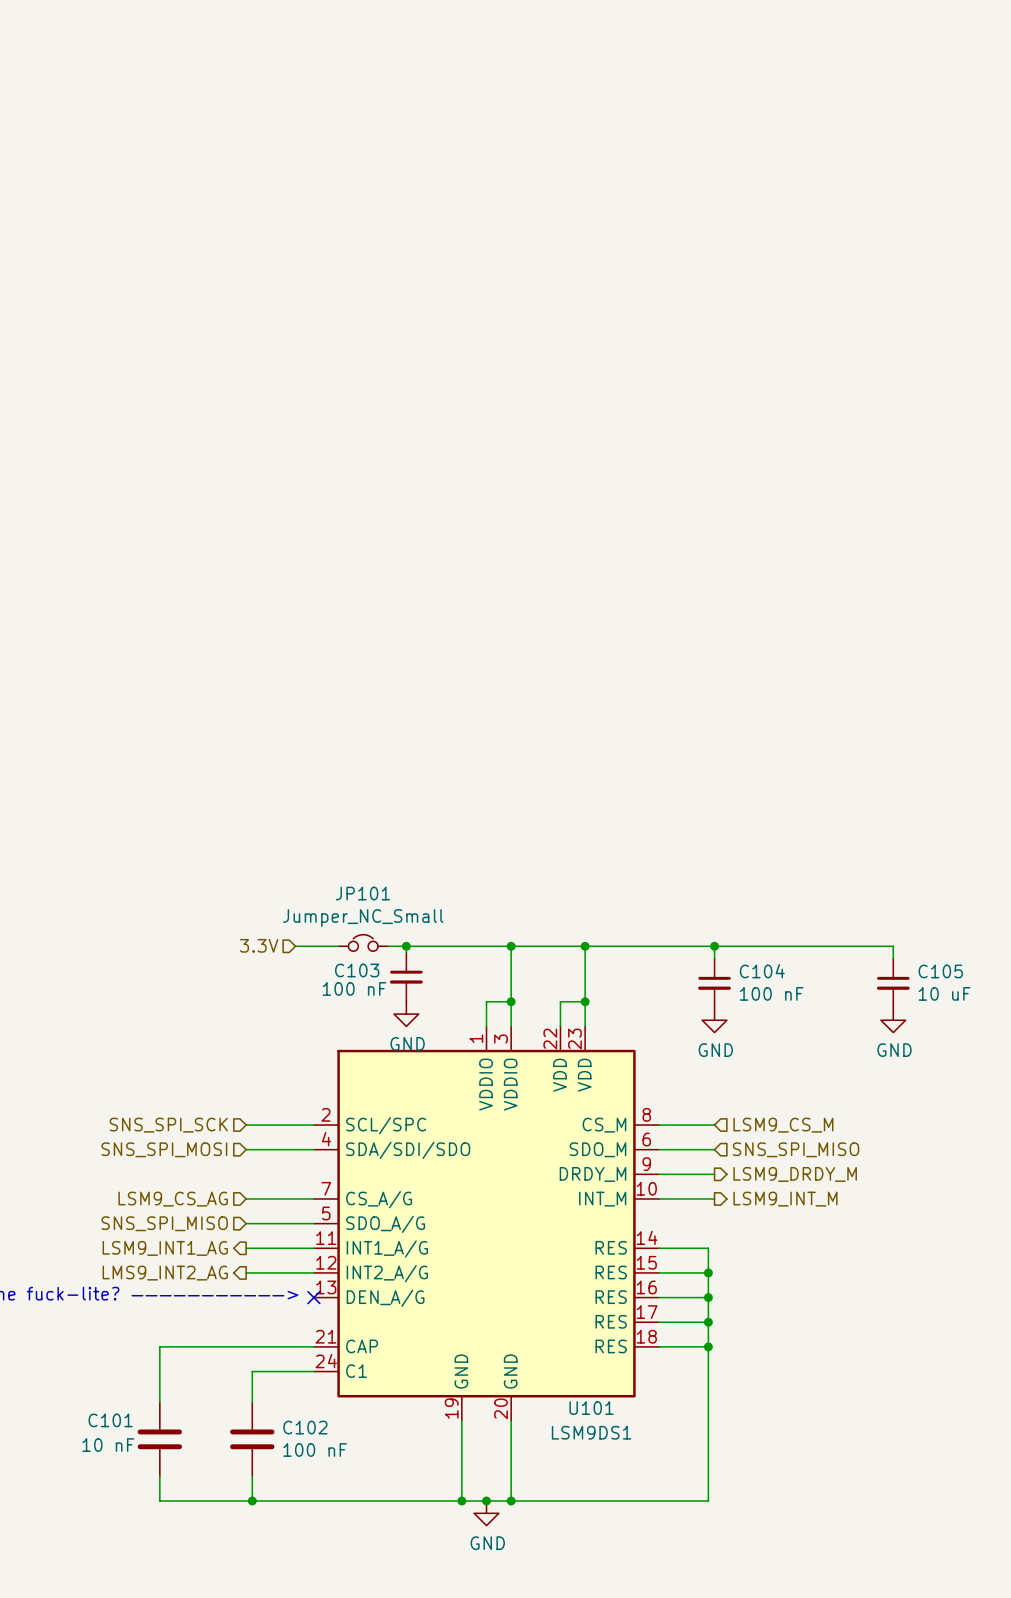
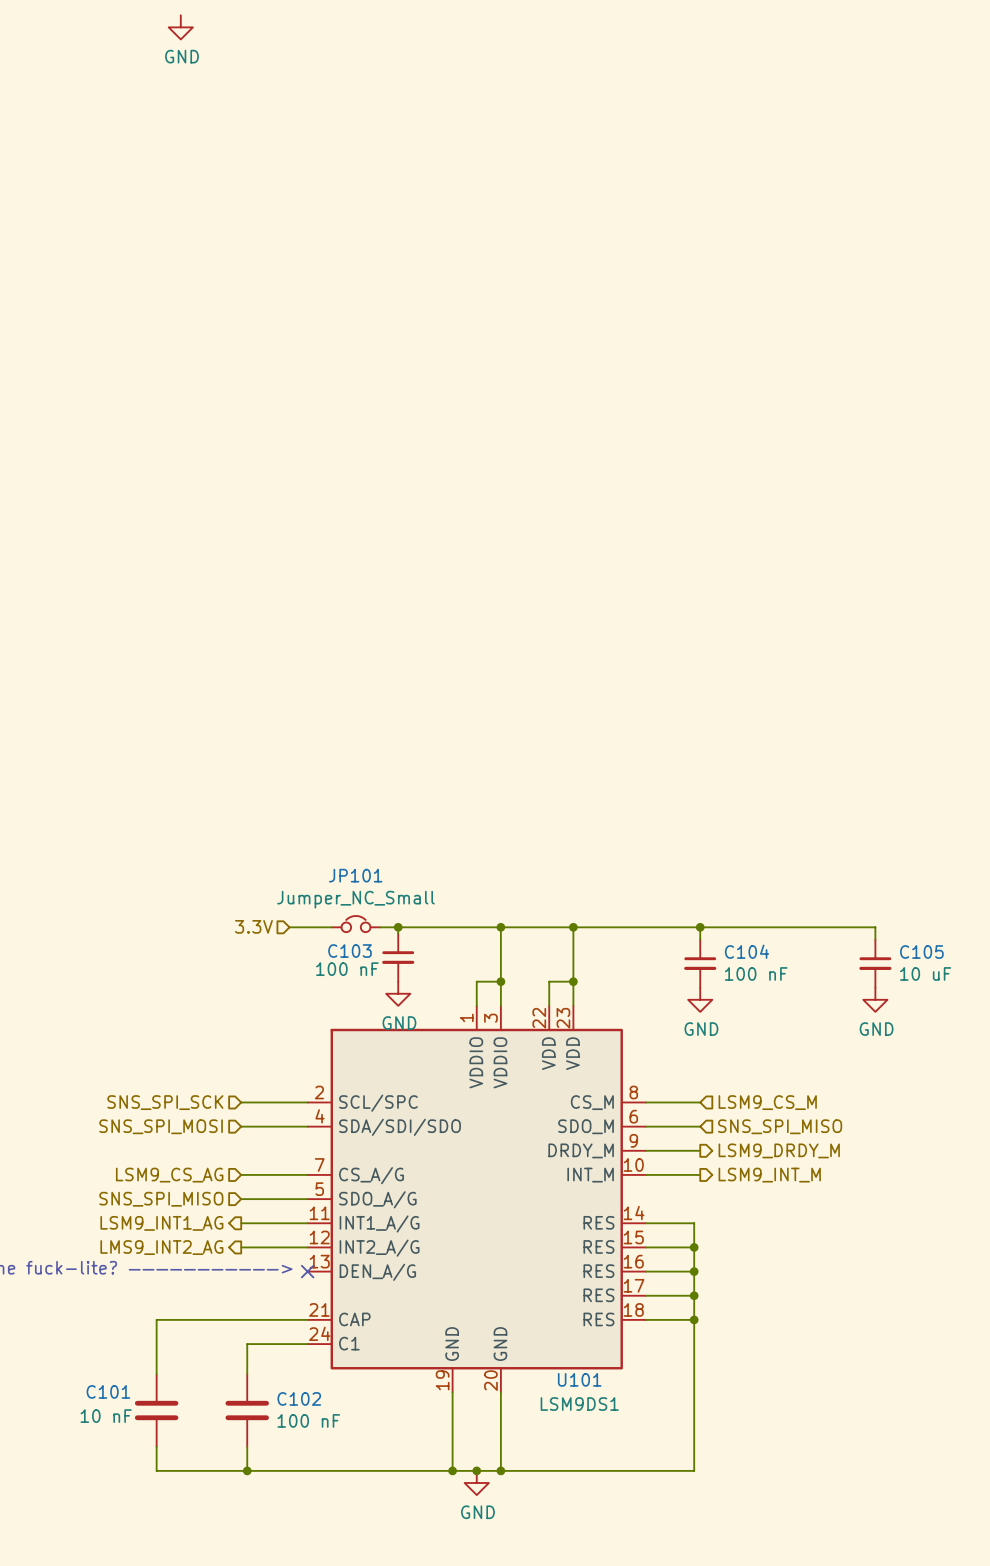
power symbol: none -> GND (180, 27)

